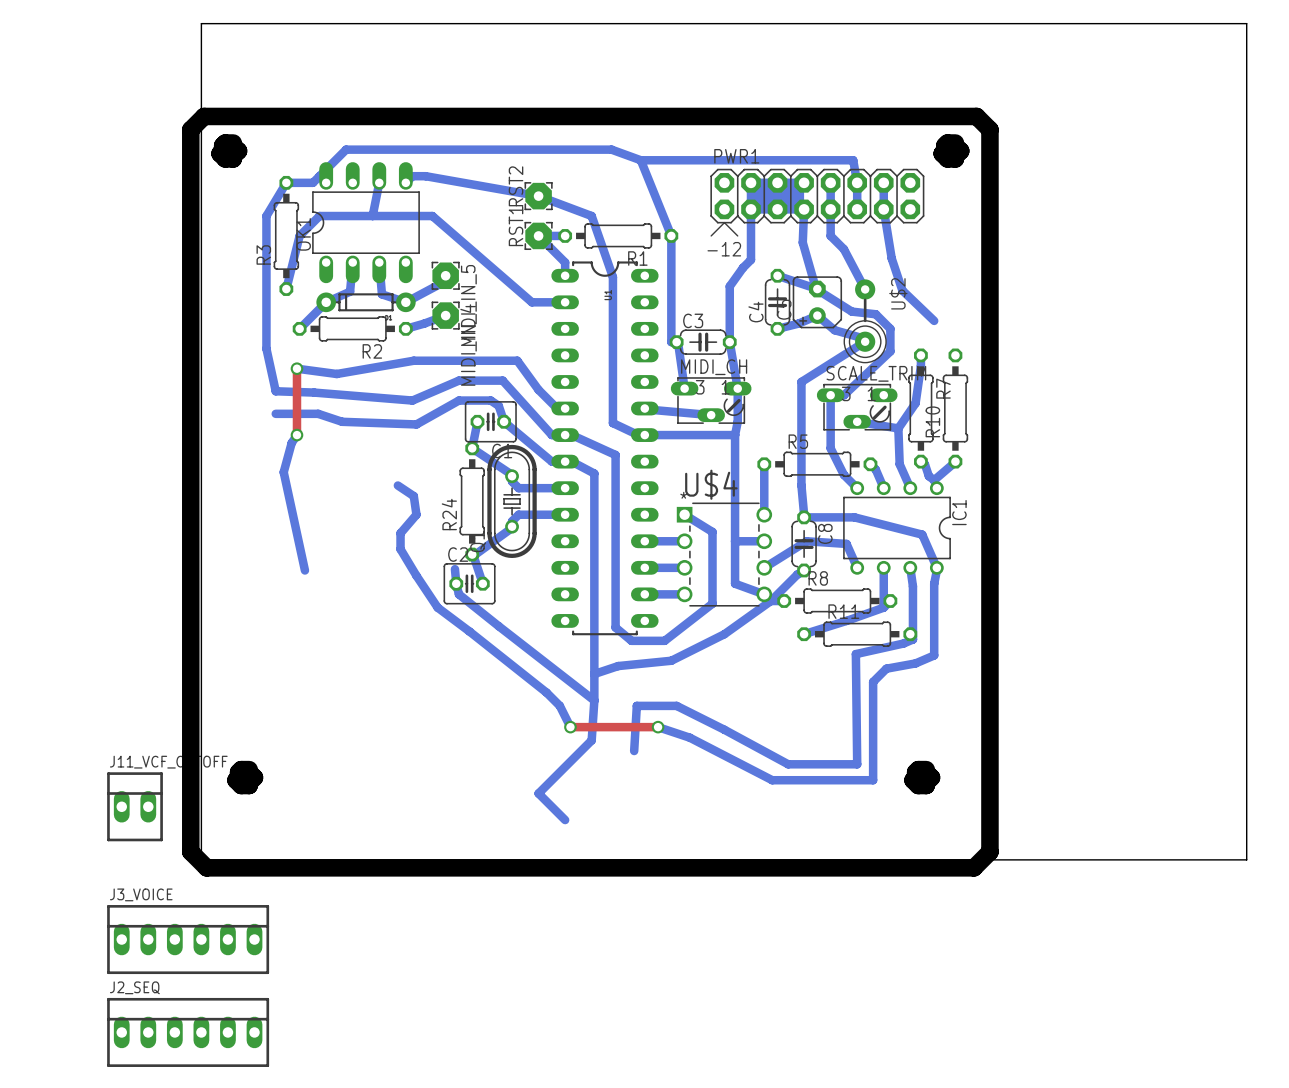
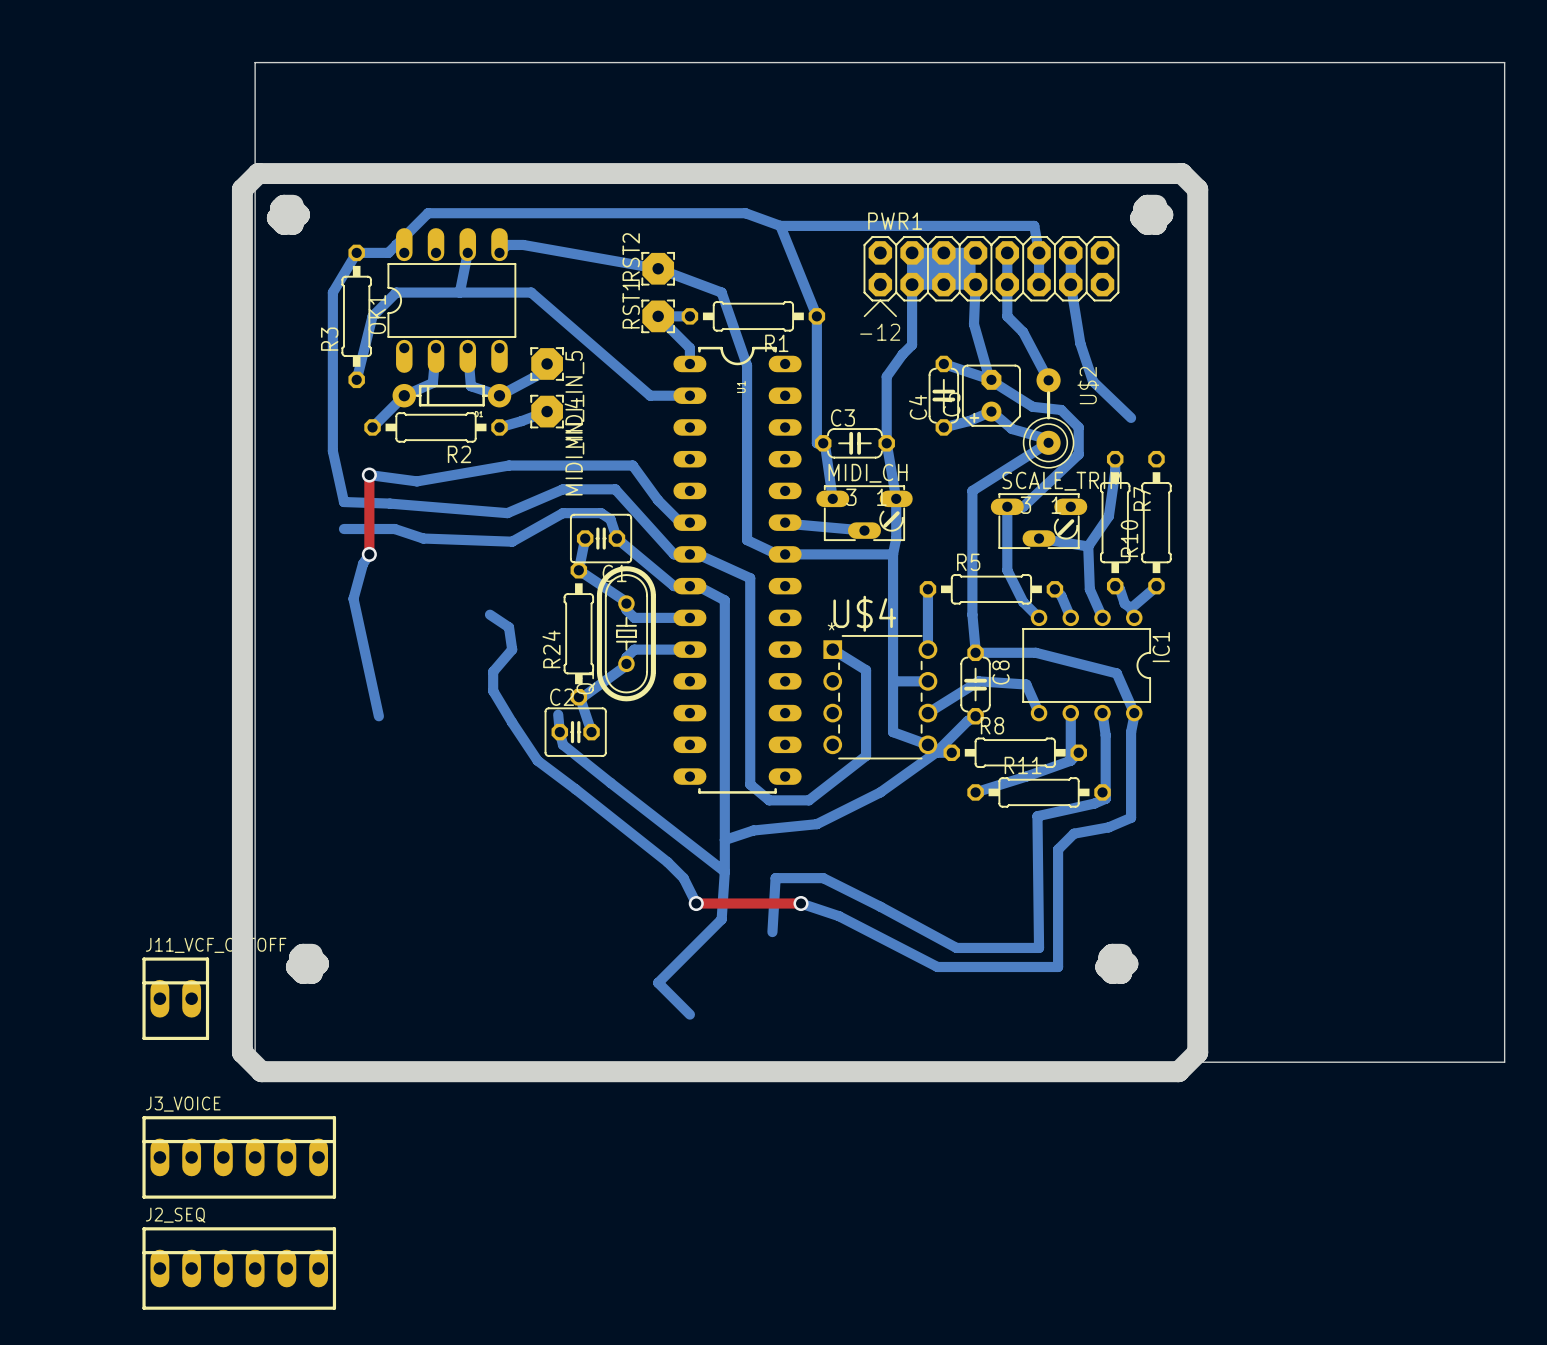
bottom track: (644, 541) (684, 541) -> none
bottom track: (644, 567) (684, 567) -> none
bottom track: (644, 594) (684, 594) -> none

